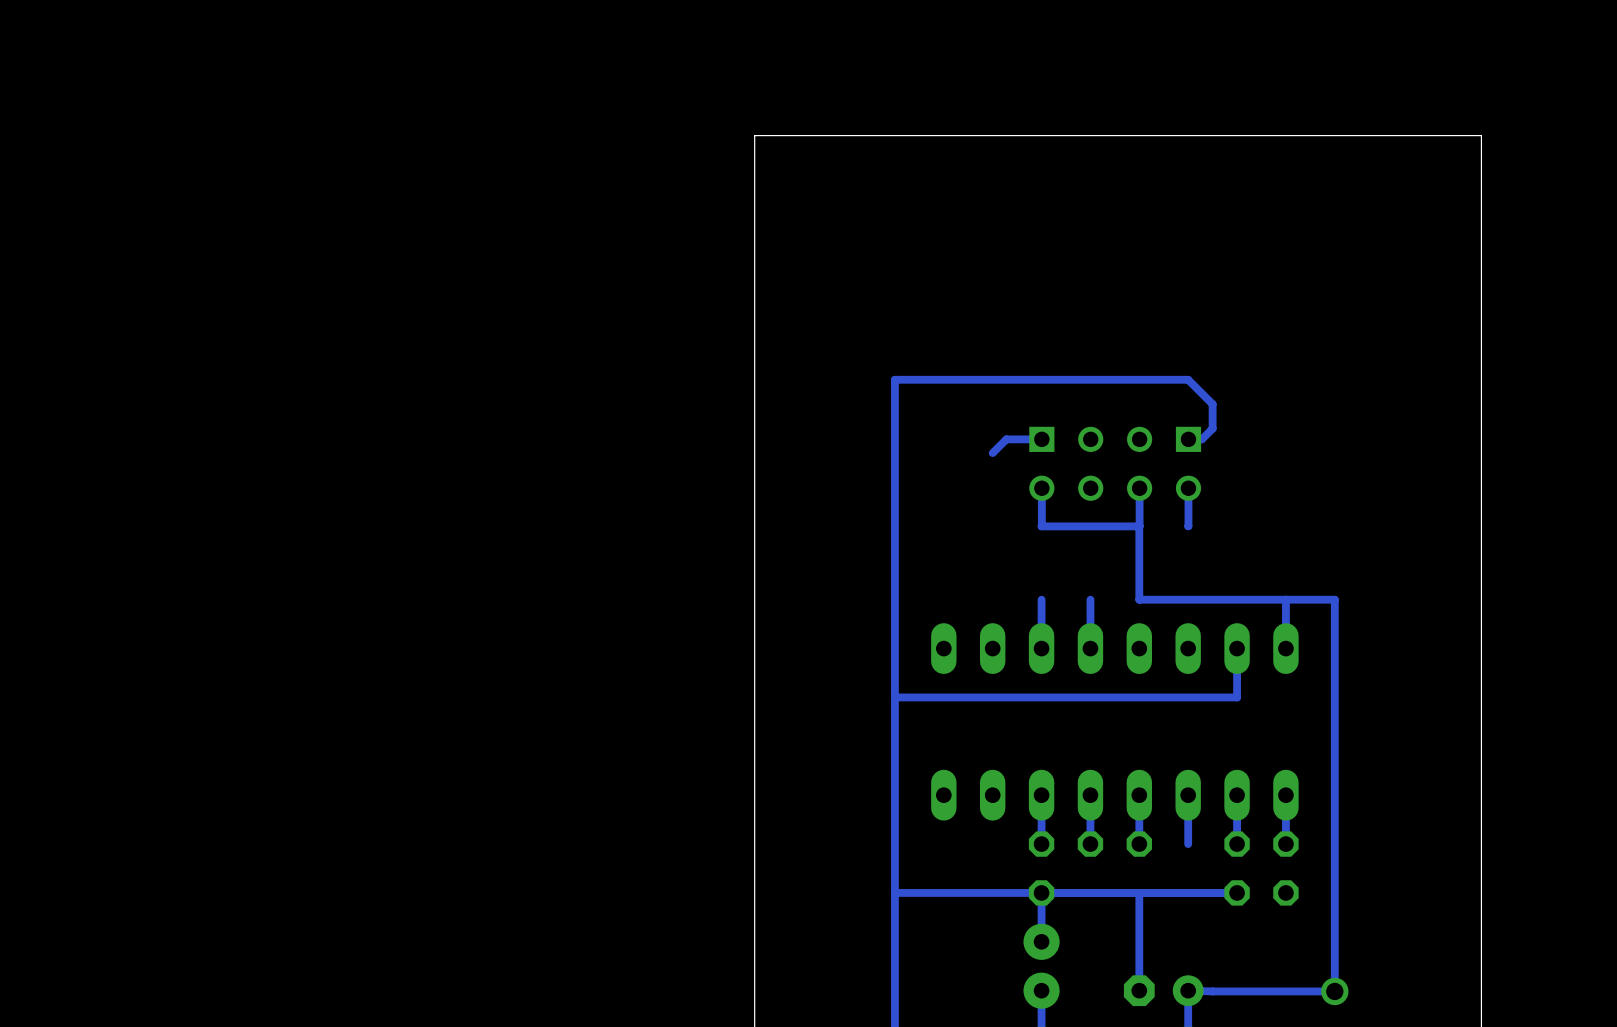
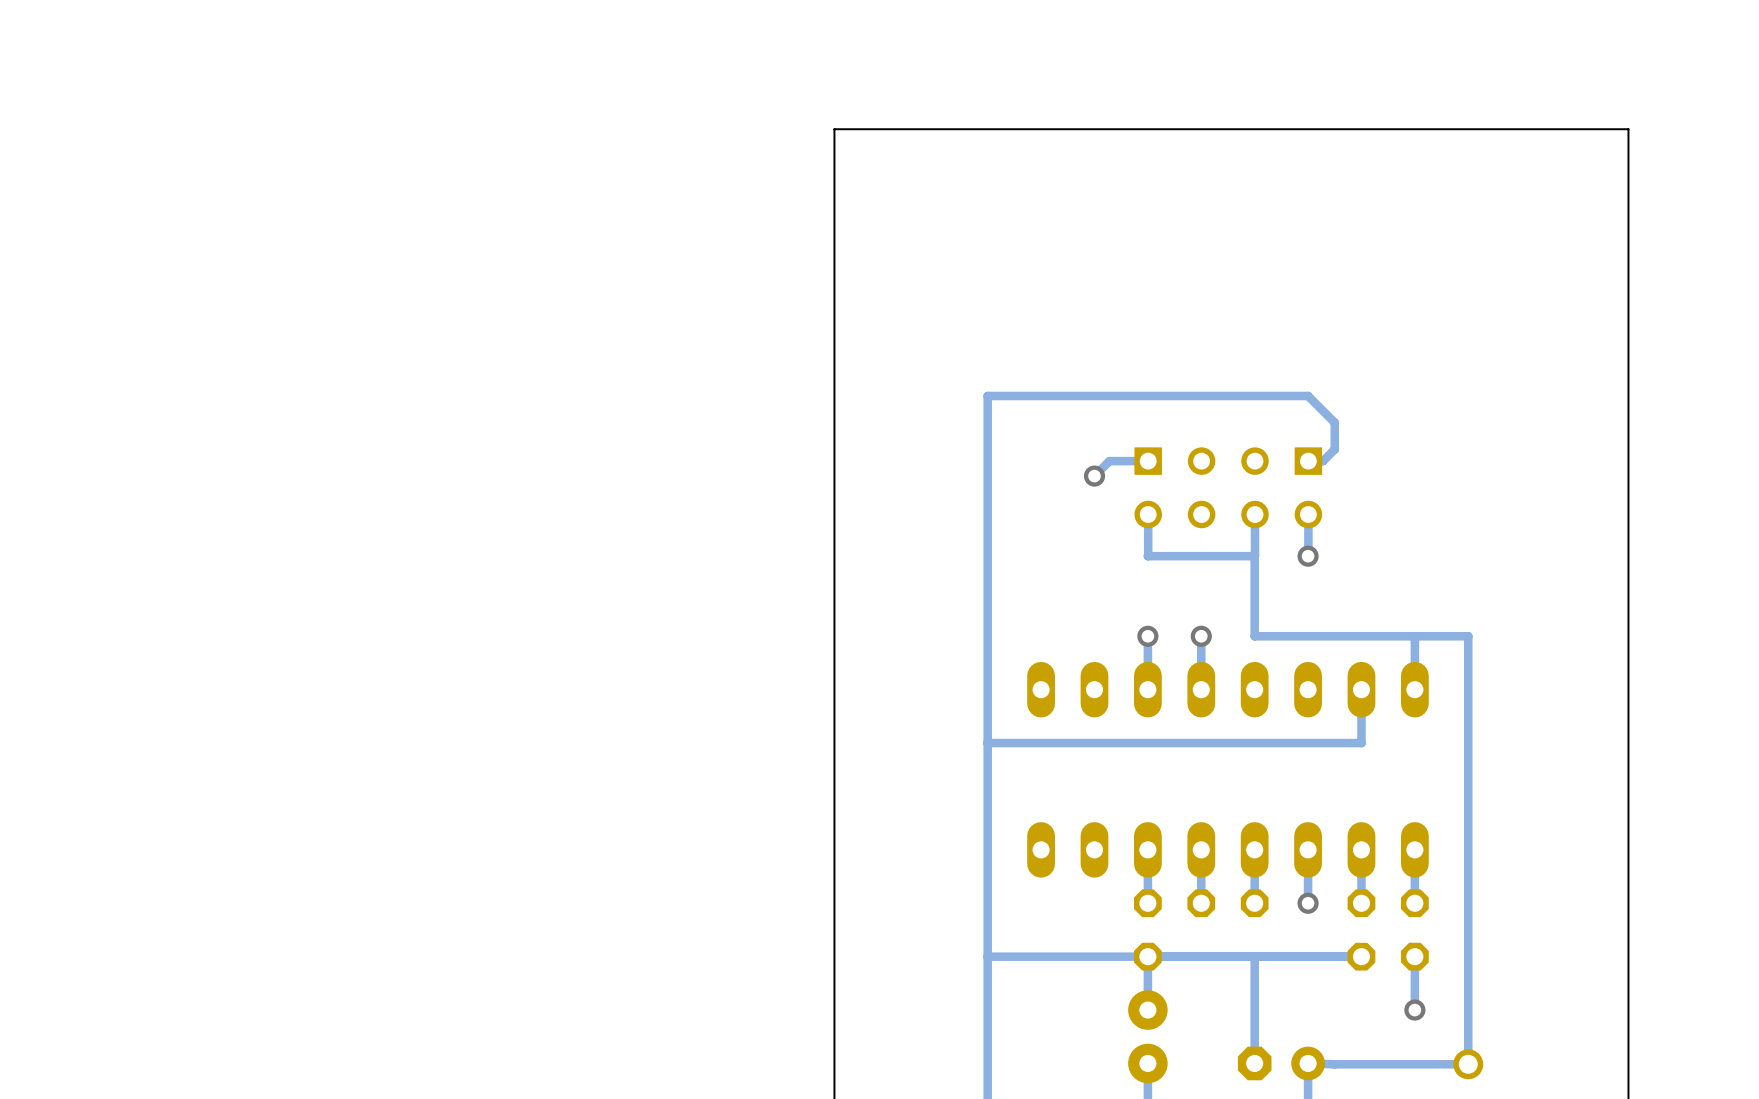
via: none -> (1094, 476)
via: none -> (1308, 556)
via: none -> (1147, 636)
via: none -> (1201, 636)
via: none -> (1308, 903)
bottom track: none -> (1414, 956) (1414, 1010)
via: none -> (1414, 1010)

